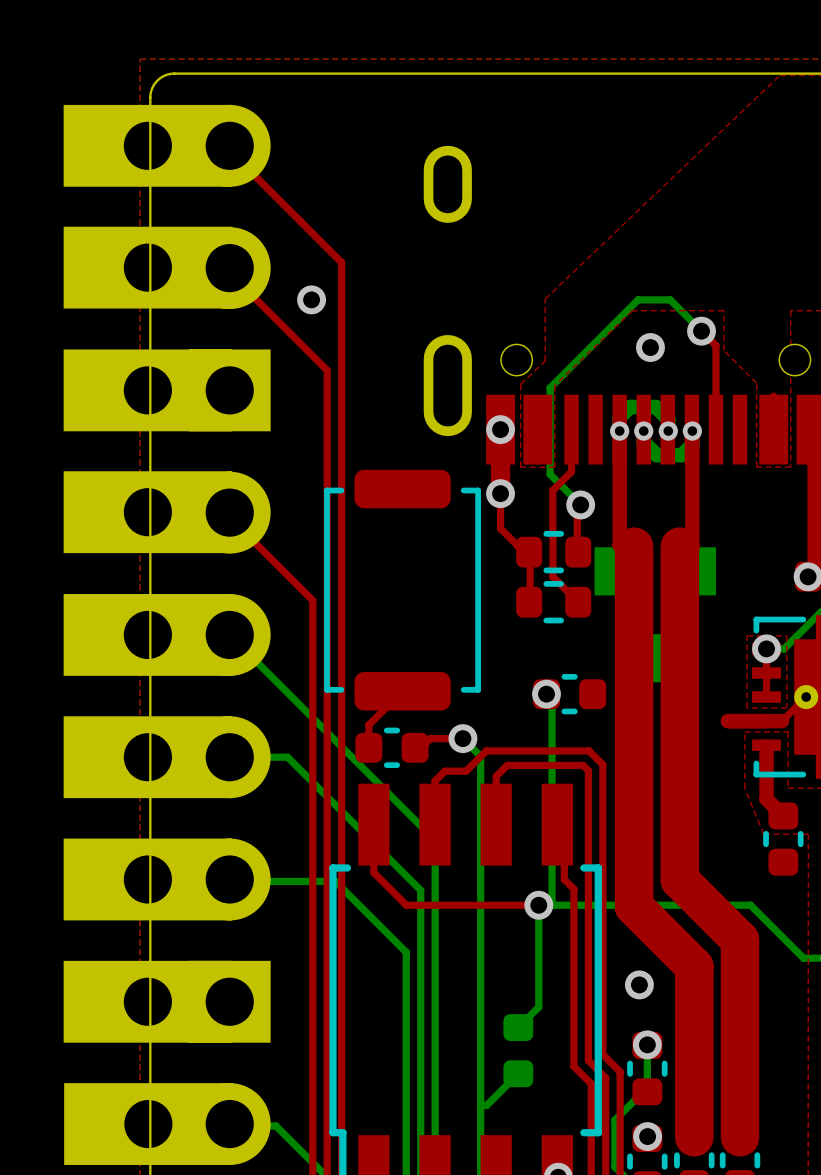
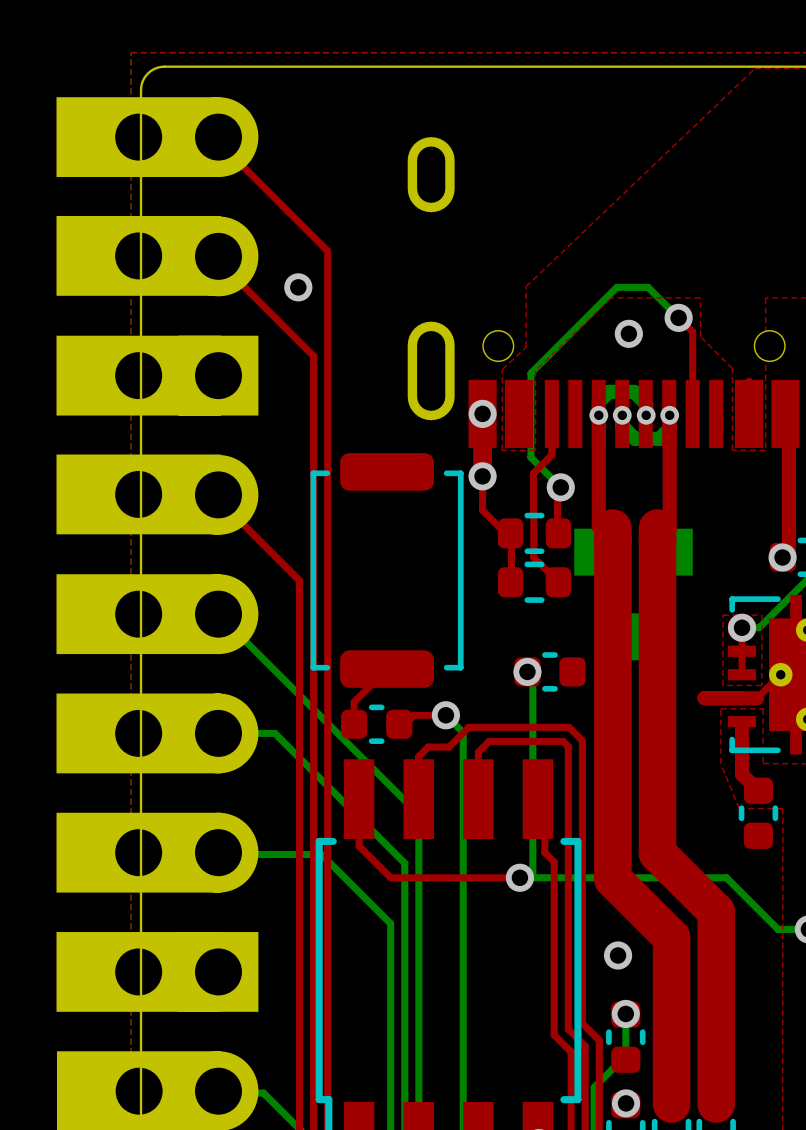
bottom track: (538, 905) (538, 1007) (518, 1027) -> none
part: (518, 1050) -> none
bottom track: (518, 1073) (486, 1105) (480, 1105) -> none

